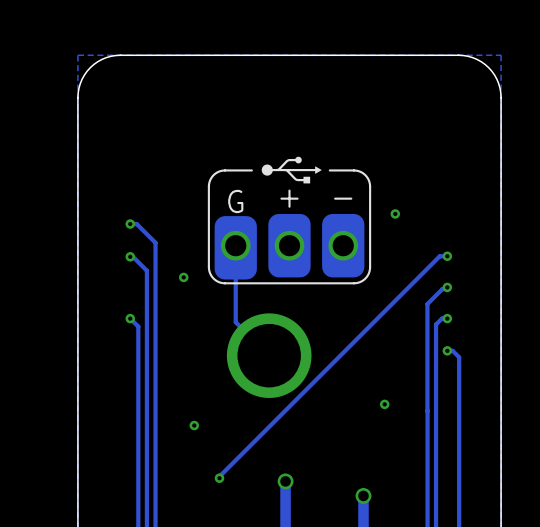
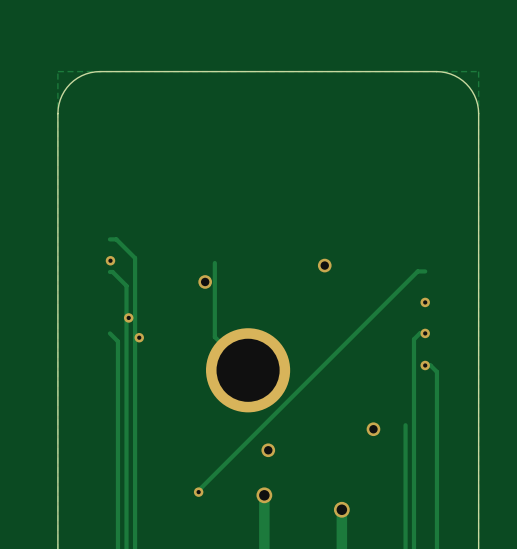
via: (395, 213) -> none
part: (289, 220) -> none
via: (130, 224) -> none
via: none -> (110, 260)
via: none -> (324, 265)
via: (130, 256) -> none
via: (447, 256) -> none
via: none -> (205, 281)
via: (183, 277) -> none
track: (447, 289) (442, 289) (427, 304) (427, 411) -> none
via: none -> (128, 317)
via: (130, 318) -> none
via: none -> (139, 337)
via position: (384, 404) -> (373, 429)
via: (194, 425) -> none
via: none -> (268, 450)

